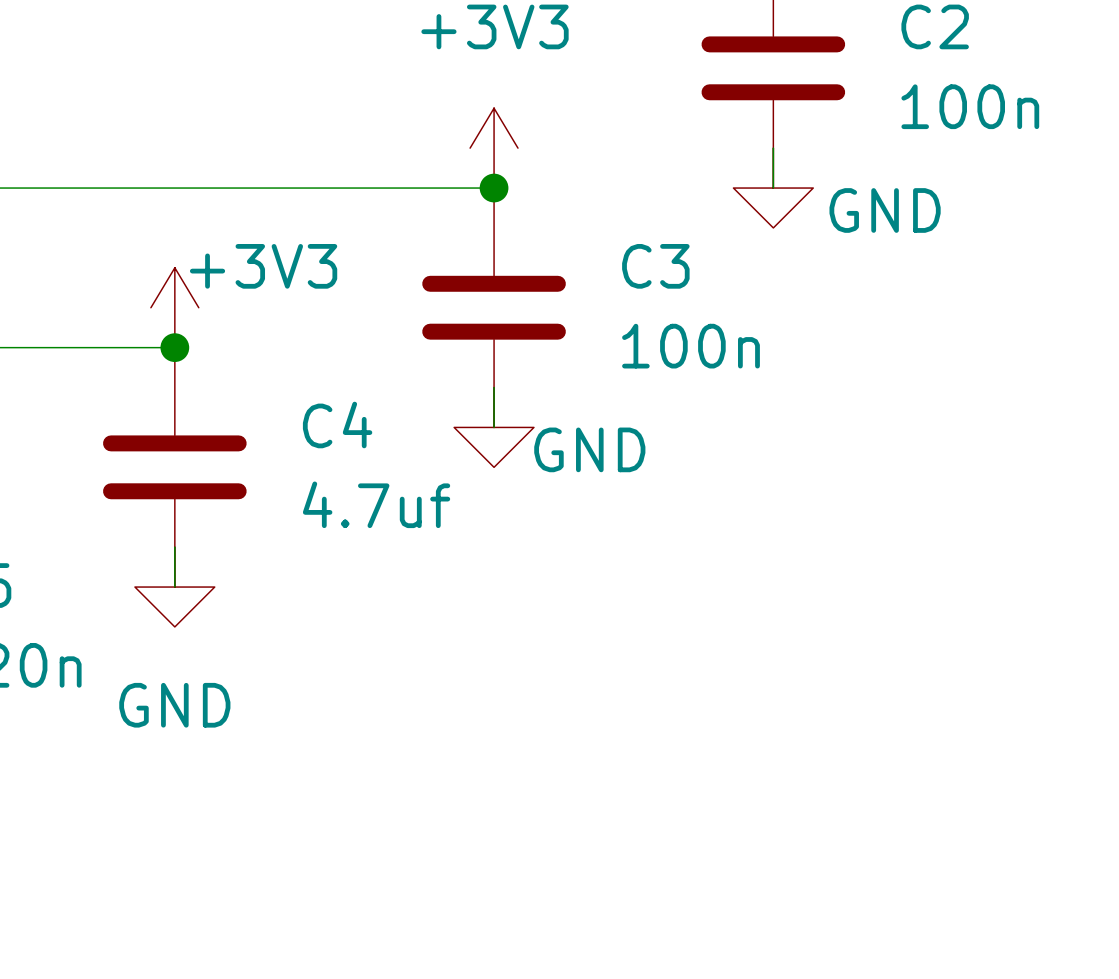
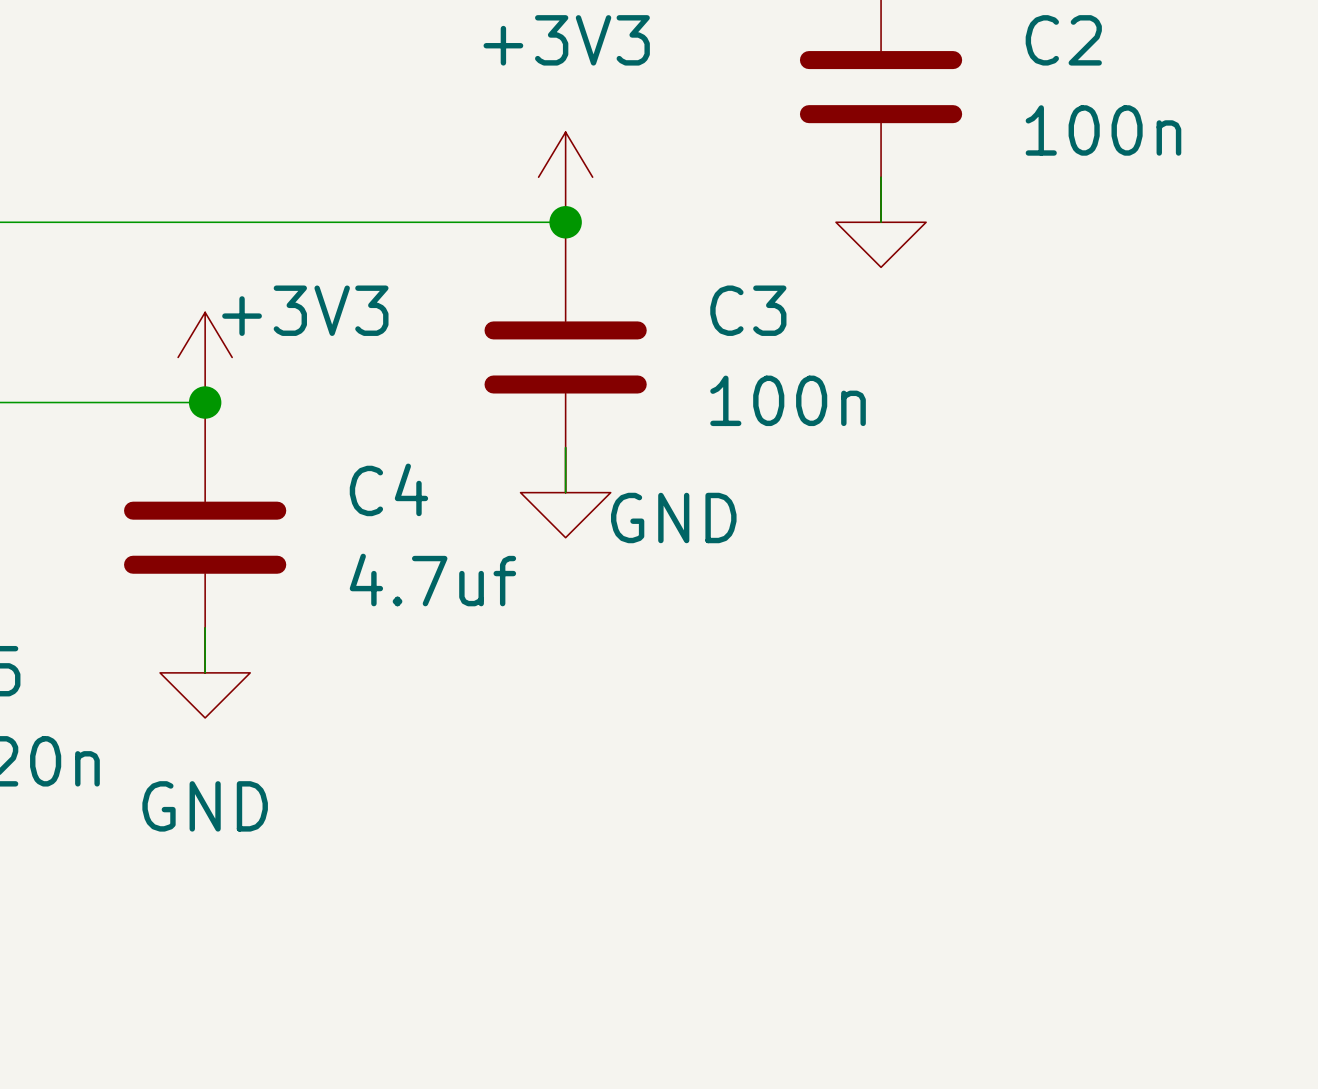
power symbol text: GND (885, 210) -> none

